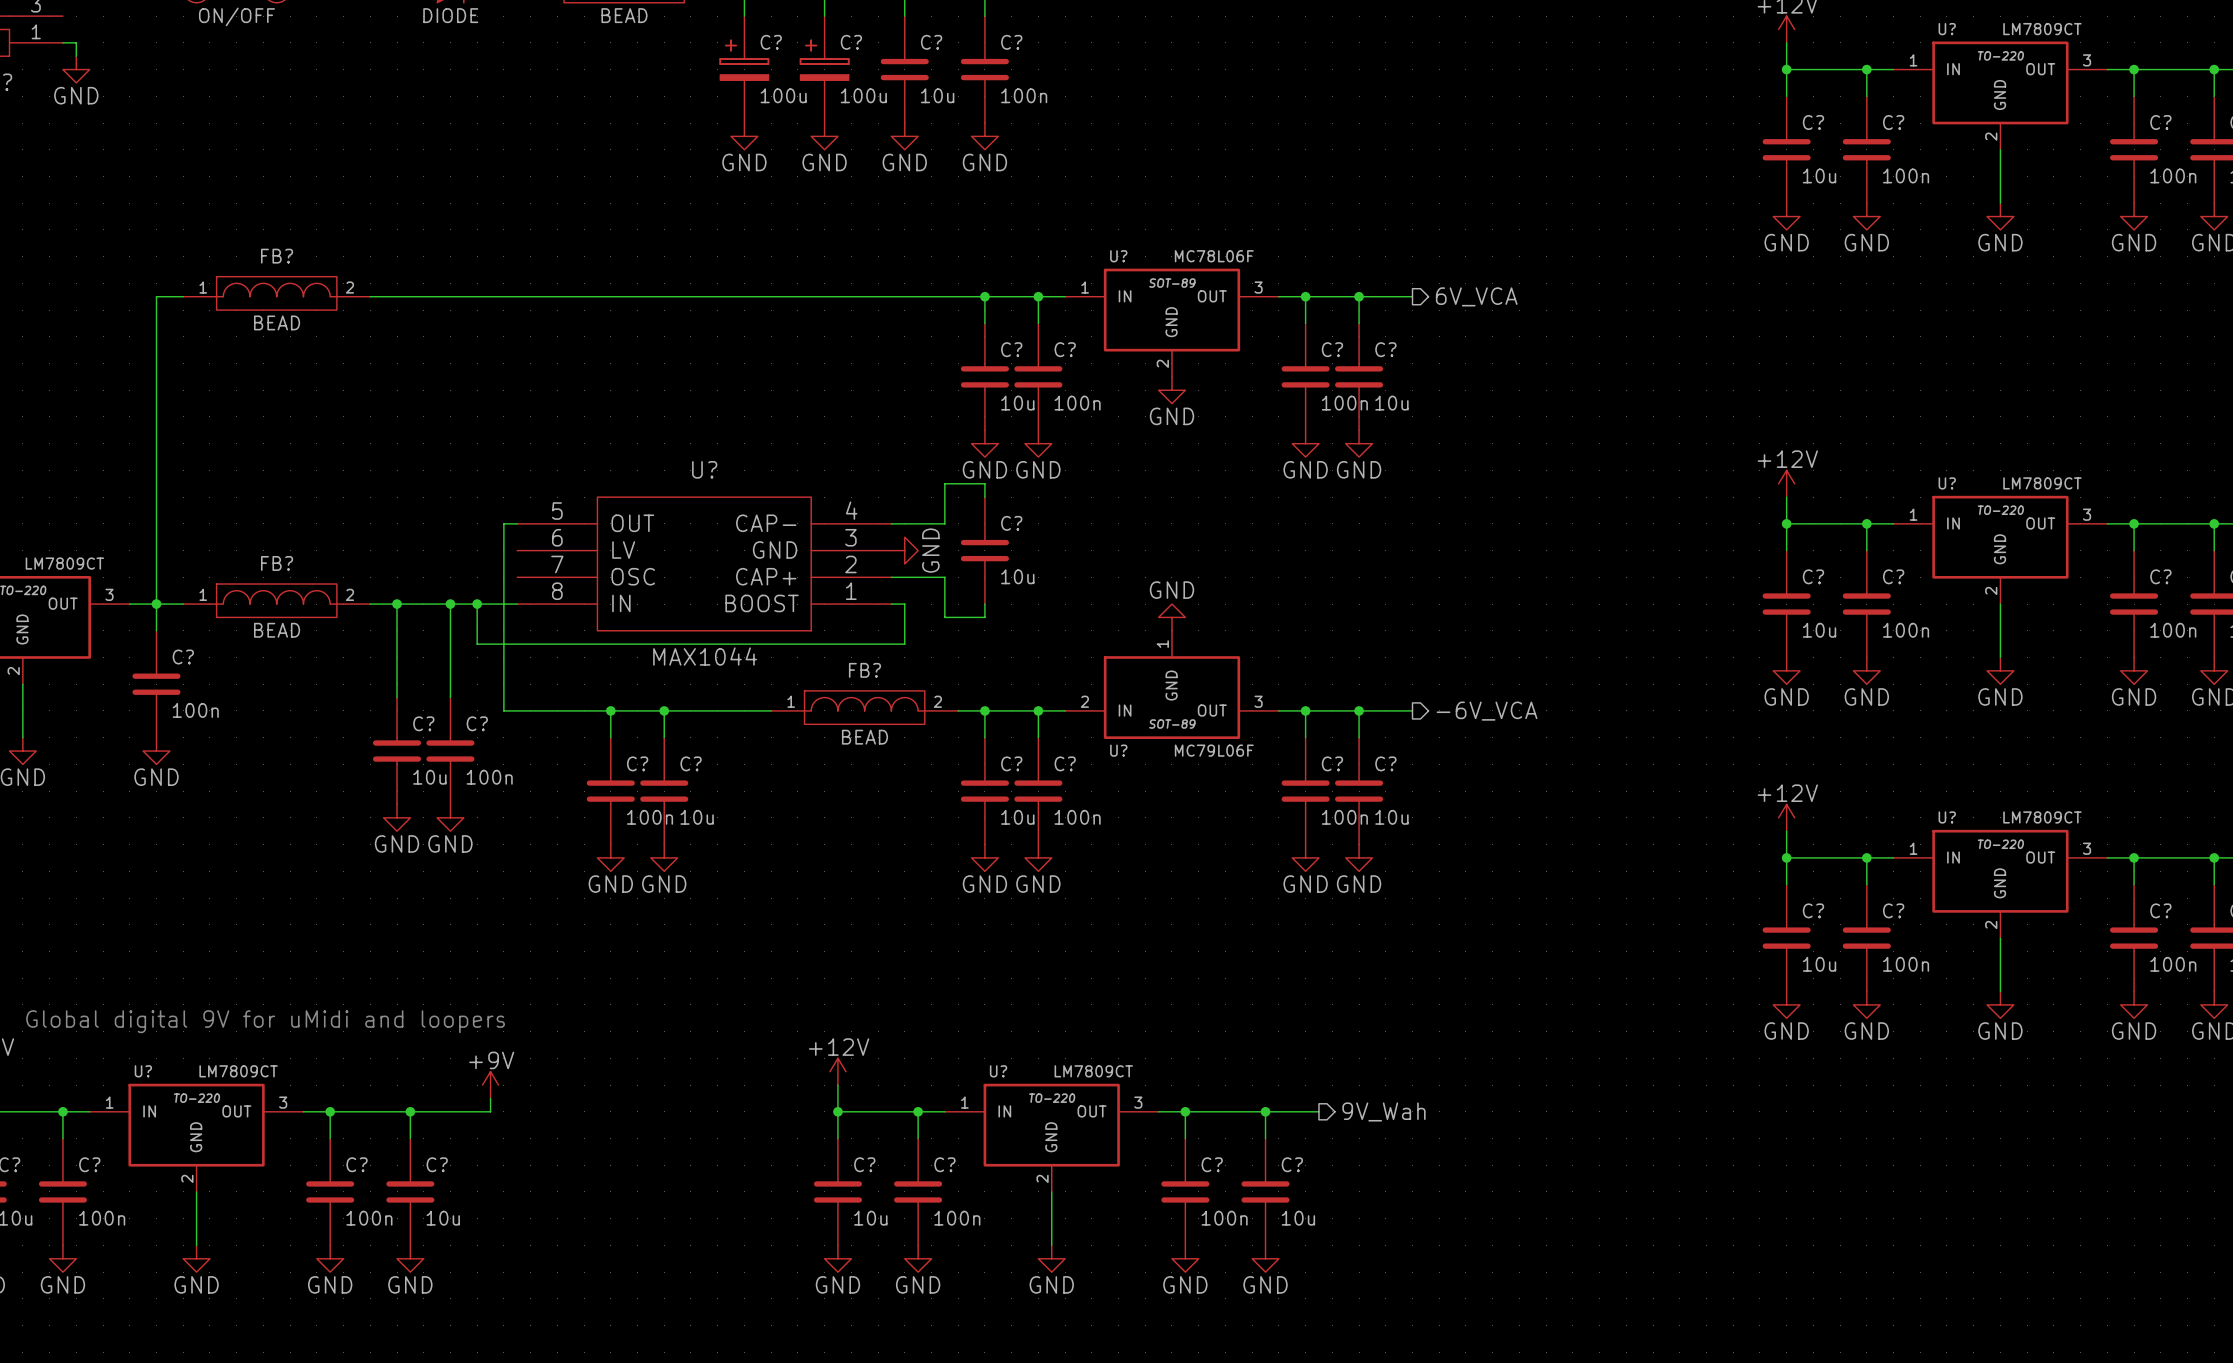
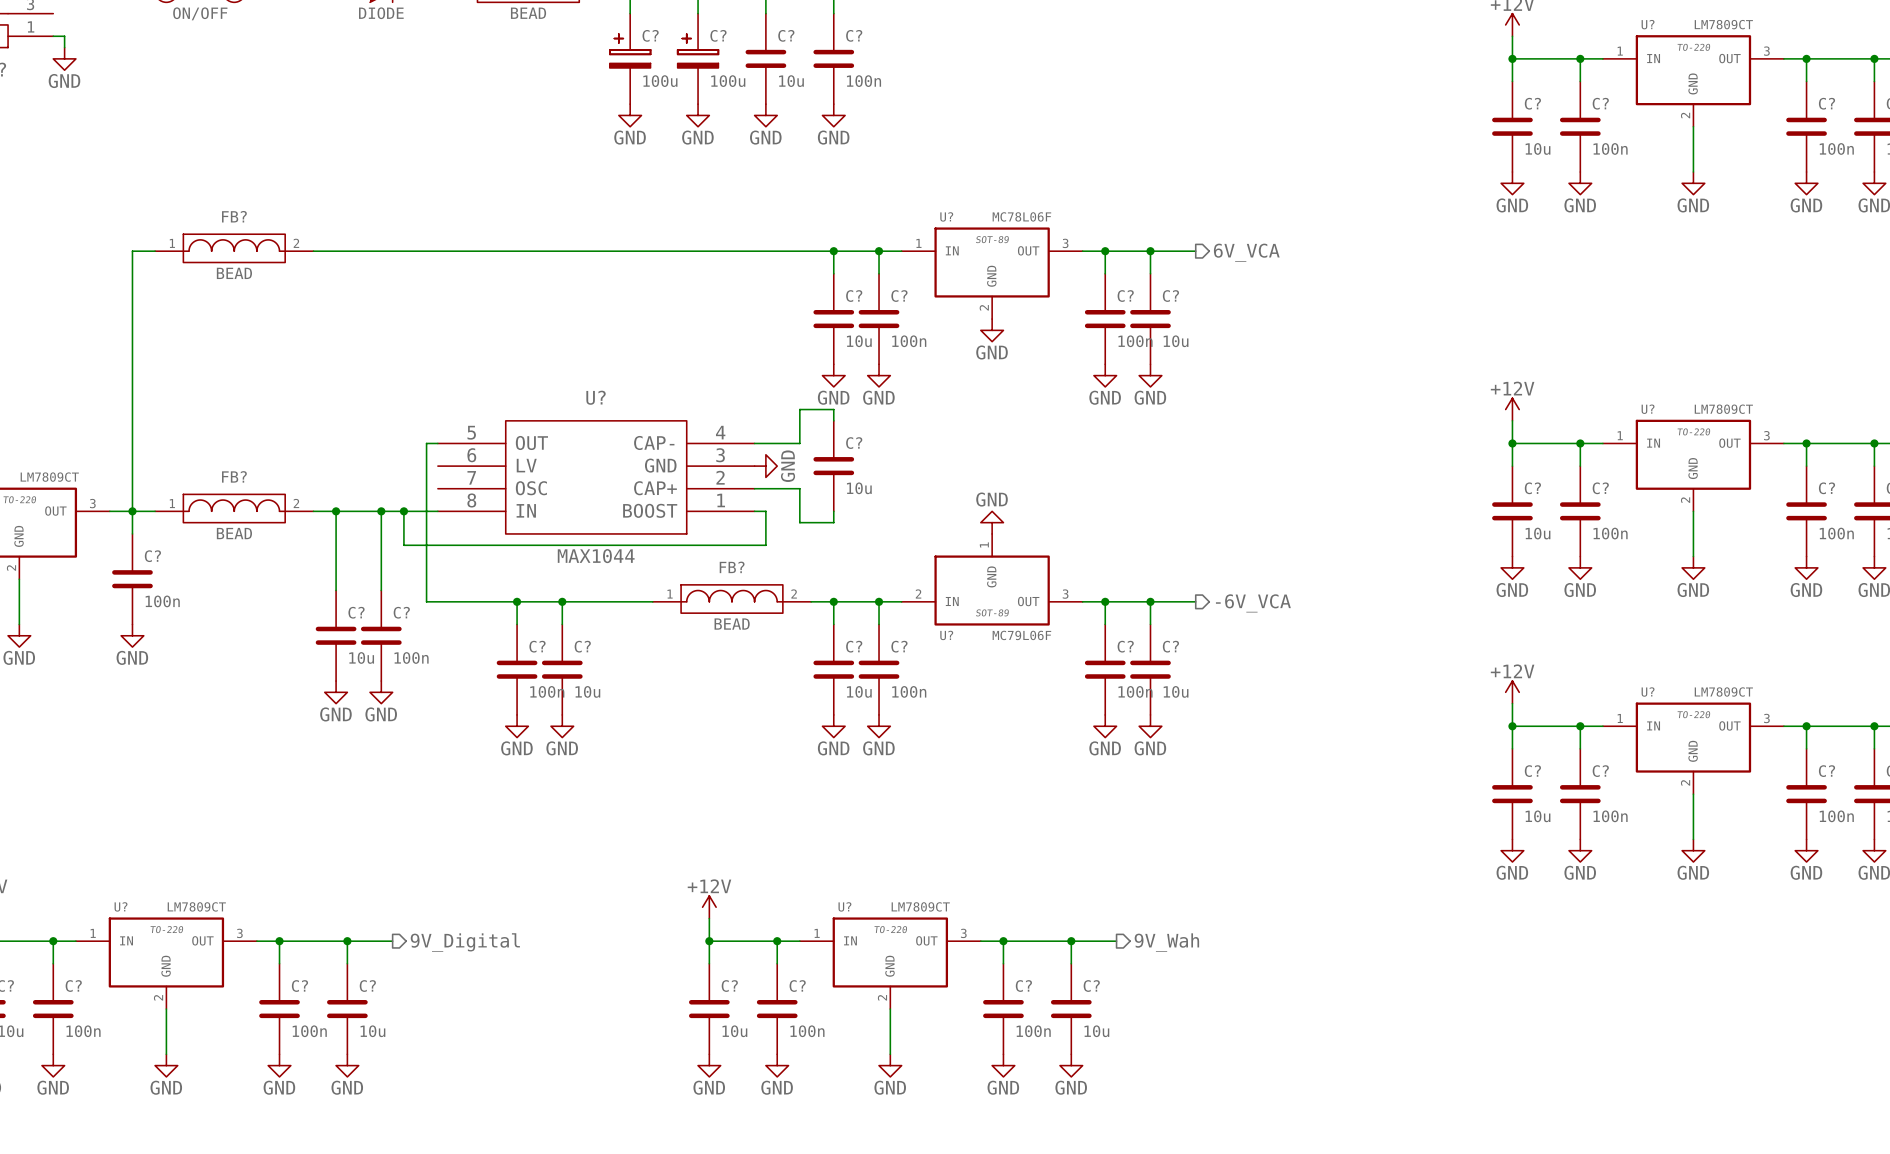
text: Global digital 9V for uMidi and loopers (265, 1021) -> none
power symbol: +9V (490, 1085) -> none
wire: (490, 1098) (490, 1111) (463, 1111) -> none
hierarchical label: none -> 9V_Digital (465, 942)

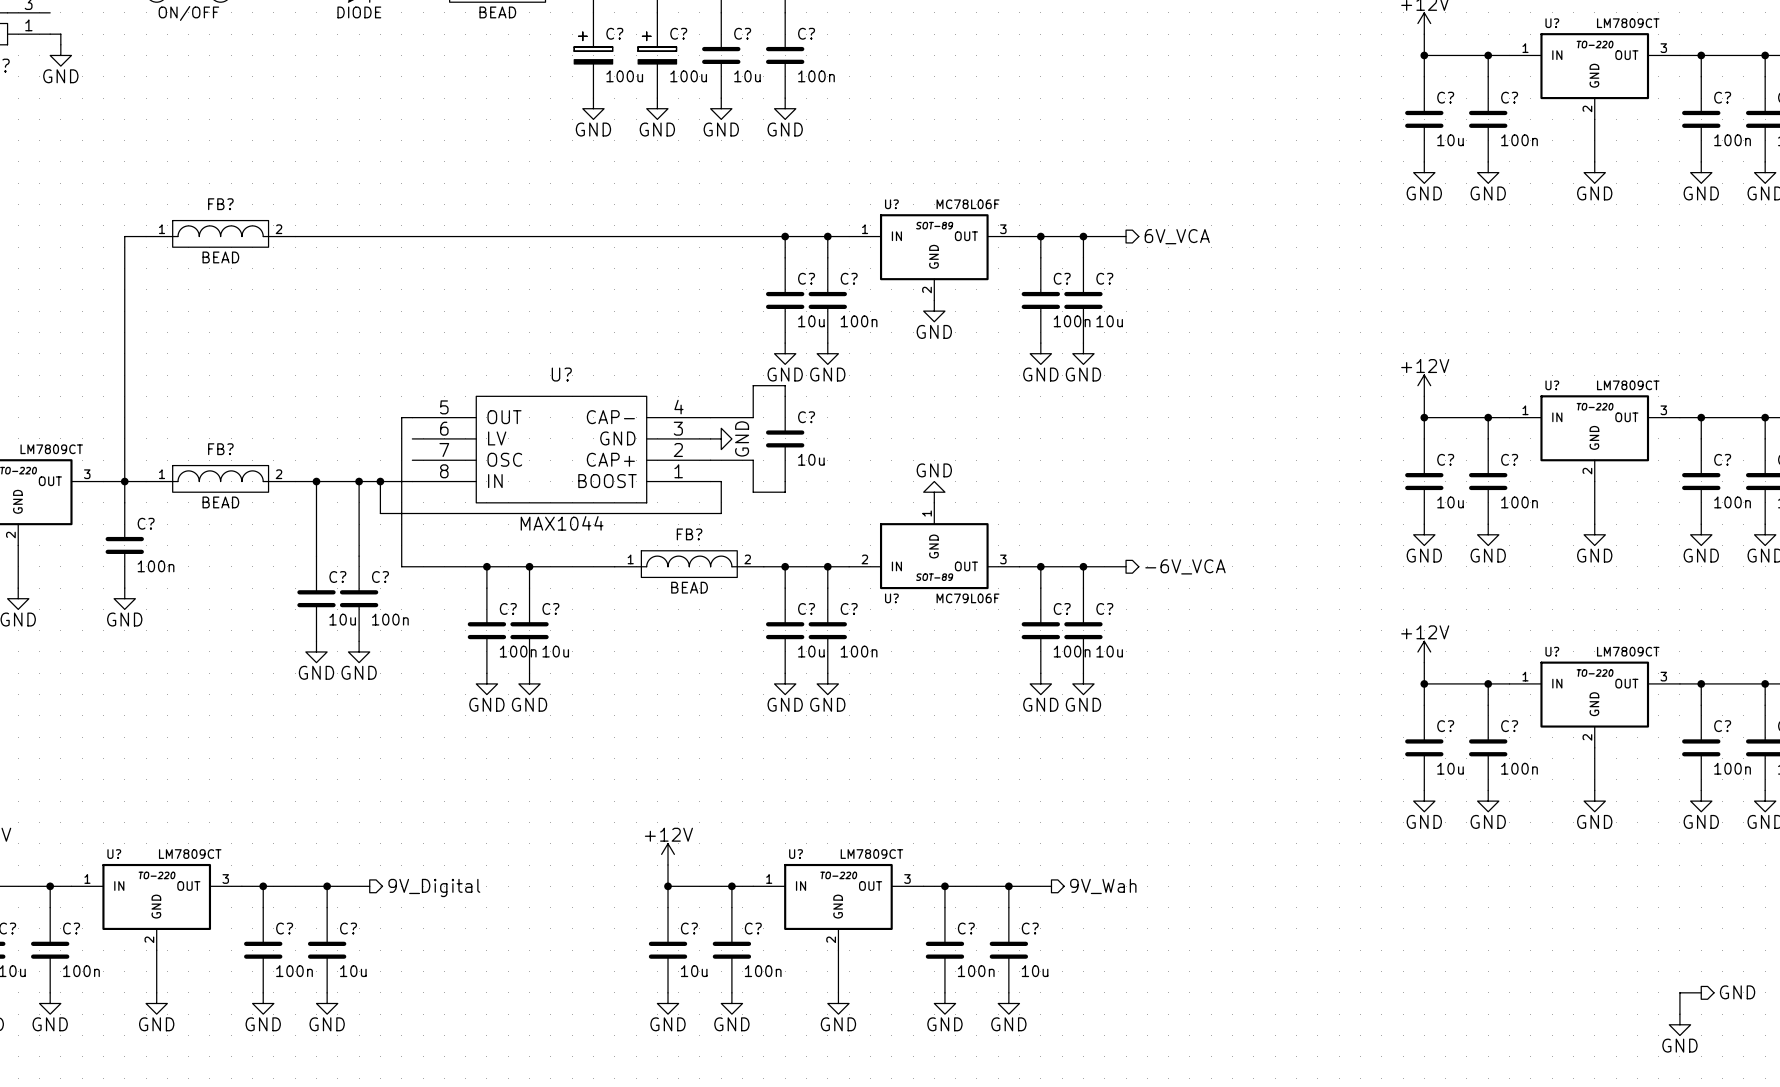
hierarchical label: none -> GND (1737, 992)
wire: none -> (1701, 992) (1679, 992) (1679, 1014)
power symbol: none -> GND (1679, 1024)

